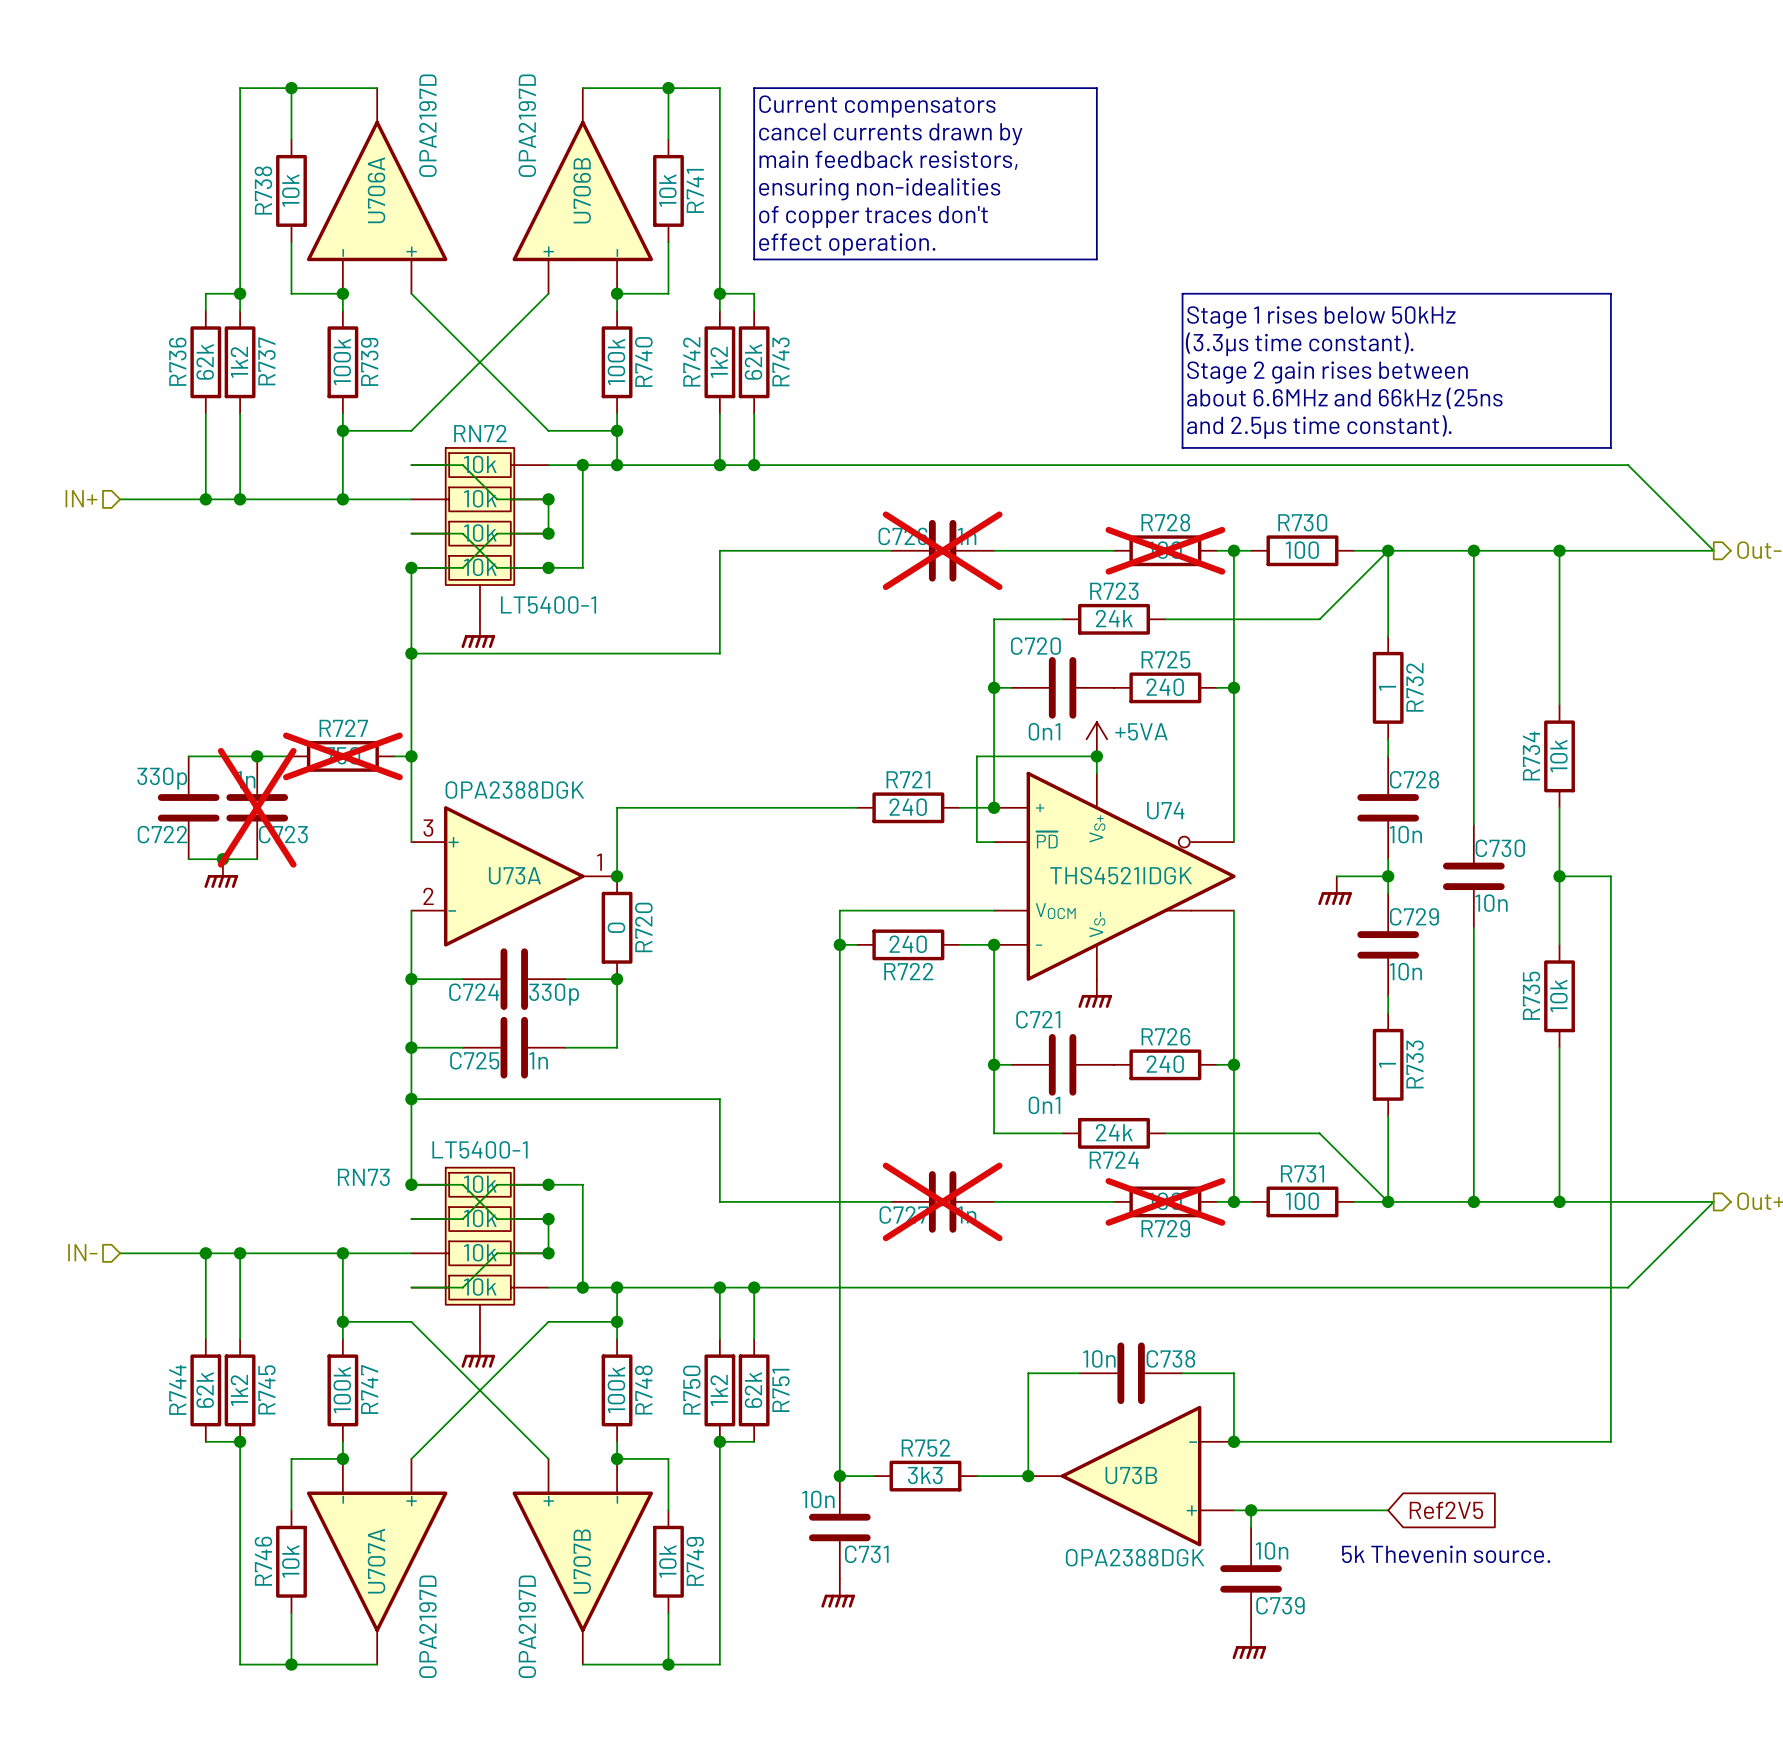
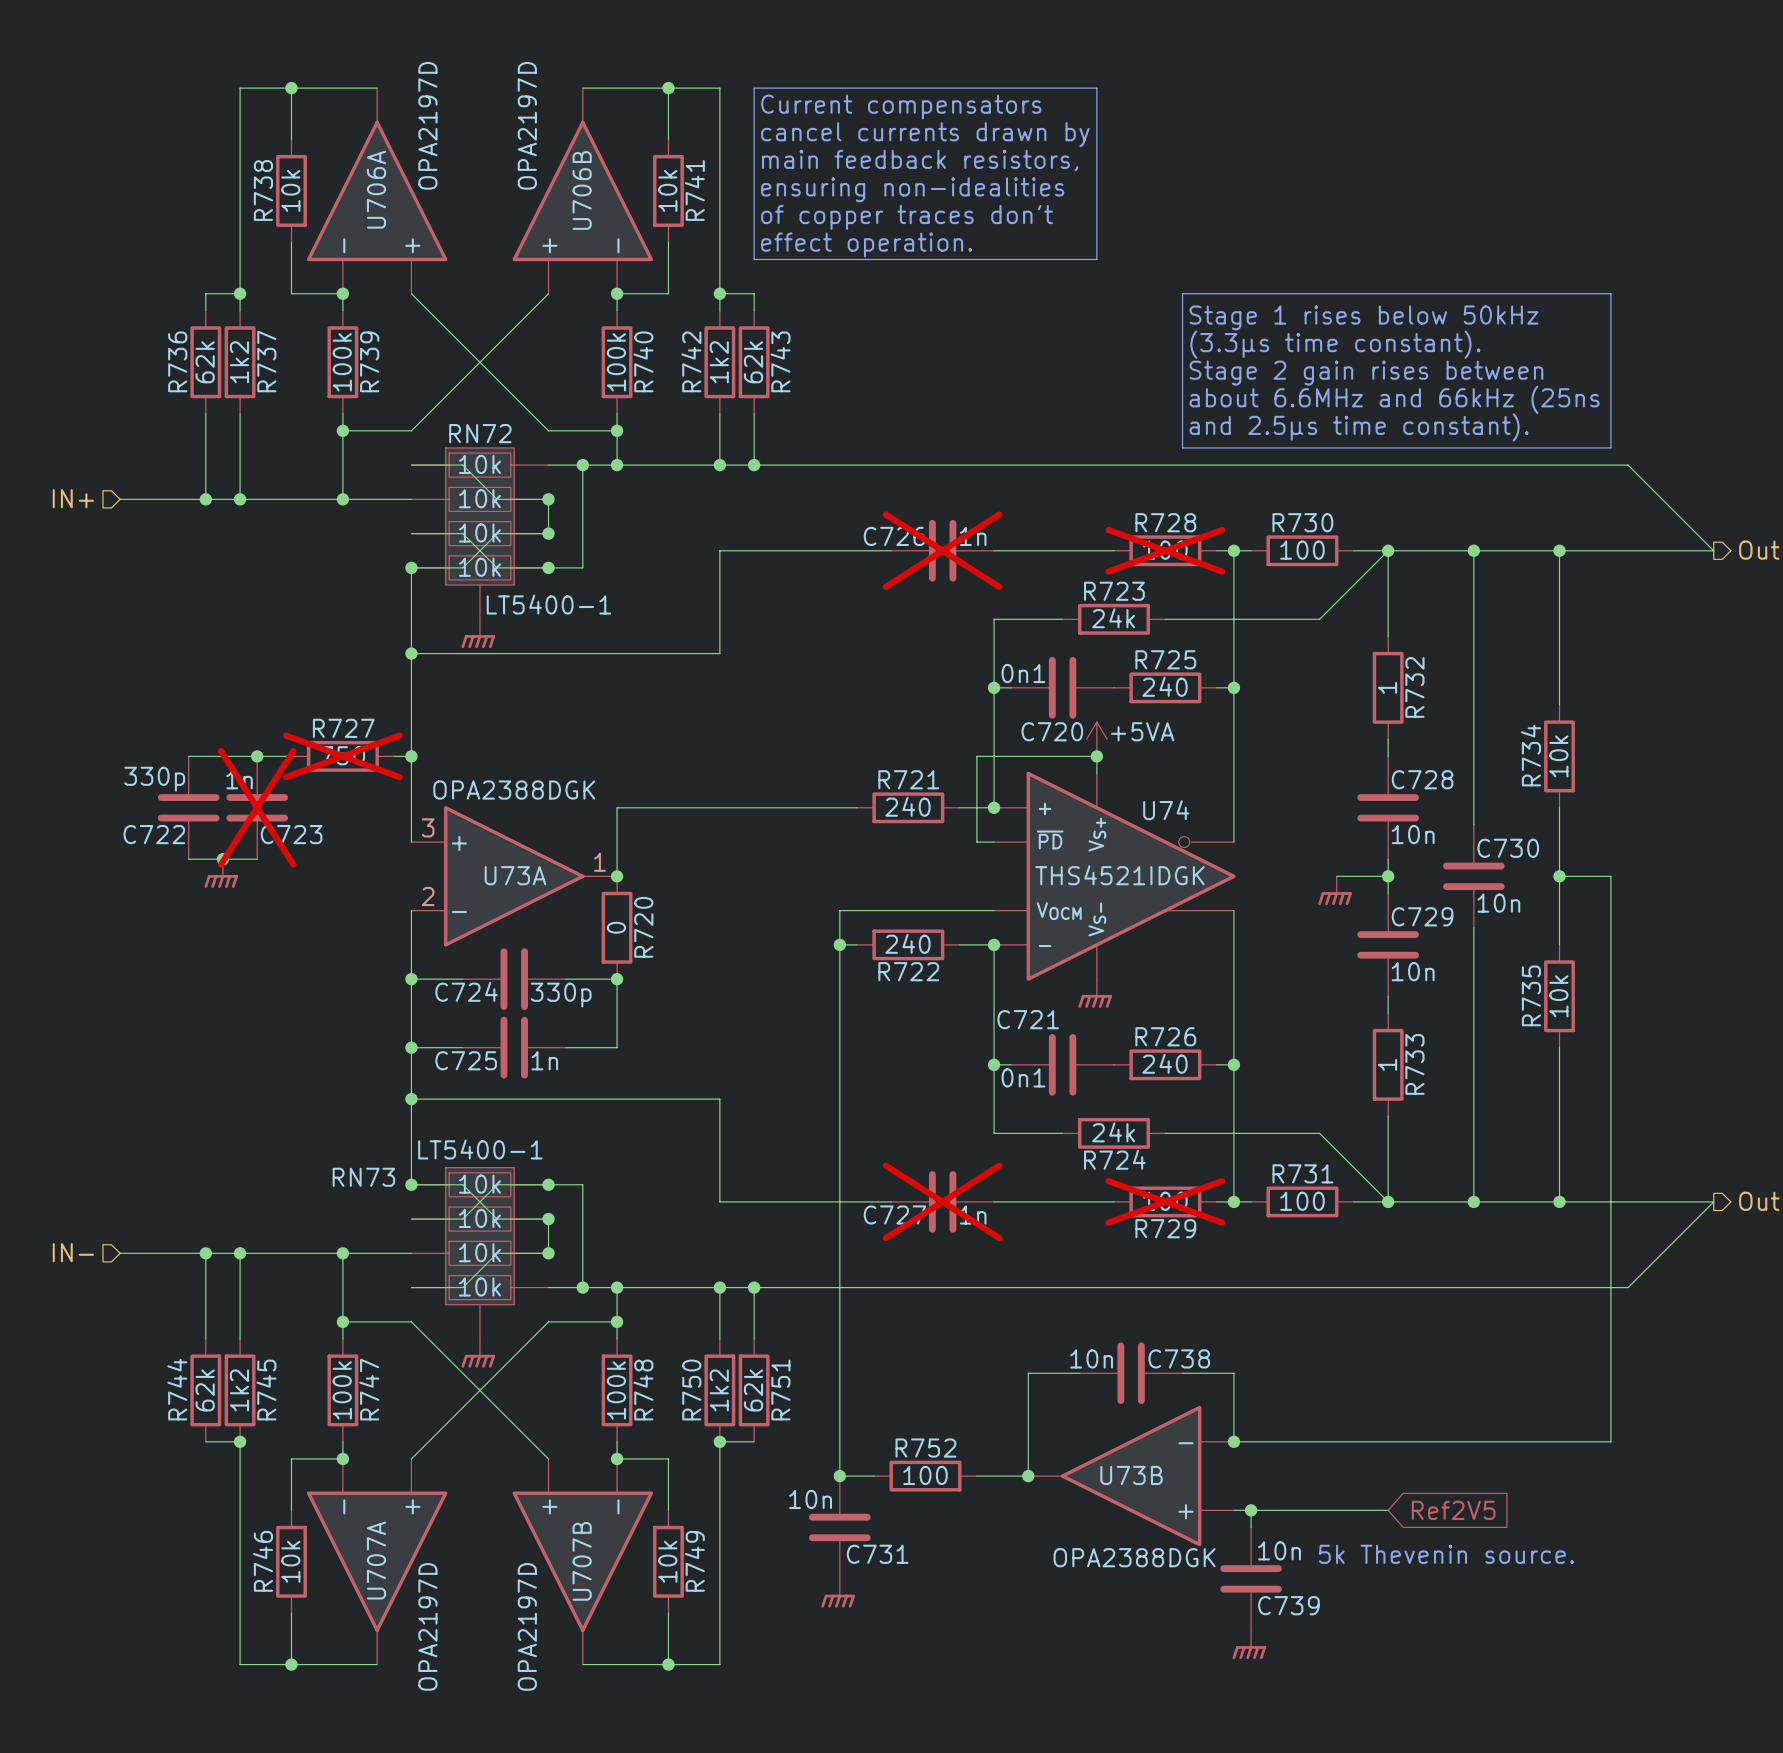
C720 name position: C720 (1035, 646) -> C720 (1052, 731)
C720 value position: 0n1 (1044, 731) -> 0n1 (1023, 673)
C721 value position: 0n1 (1044, 1105) -> 0n1 (1023, 1077)
R752 value: 3k3 (925, 1475) -> 100 (925, 1475)

